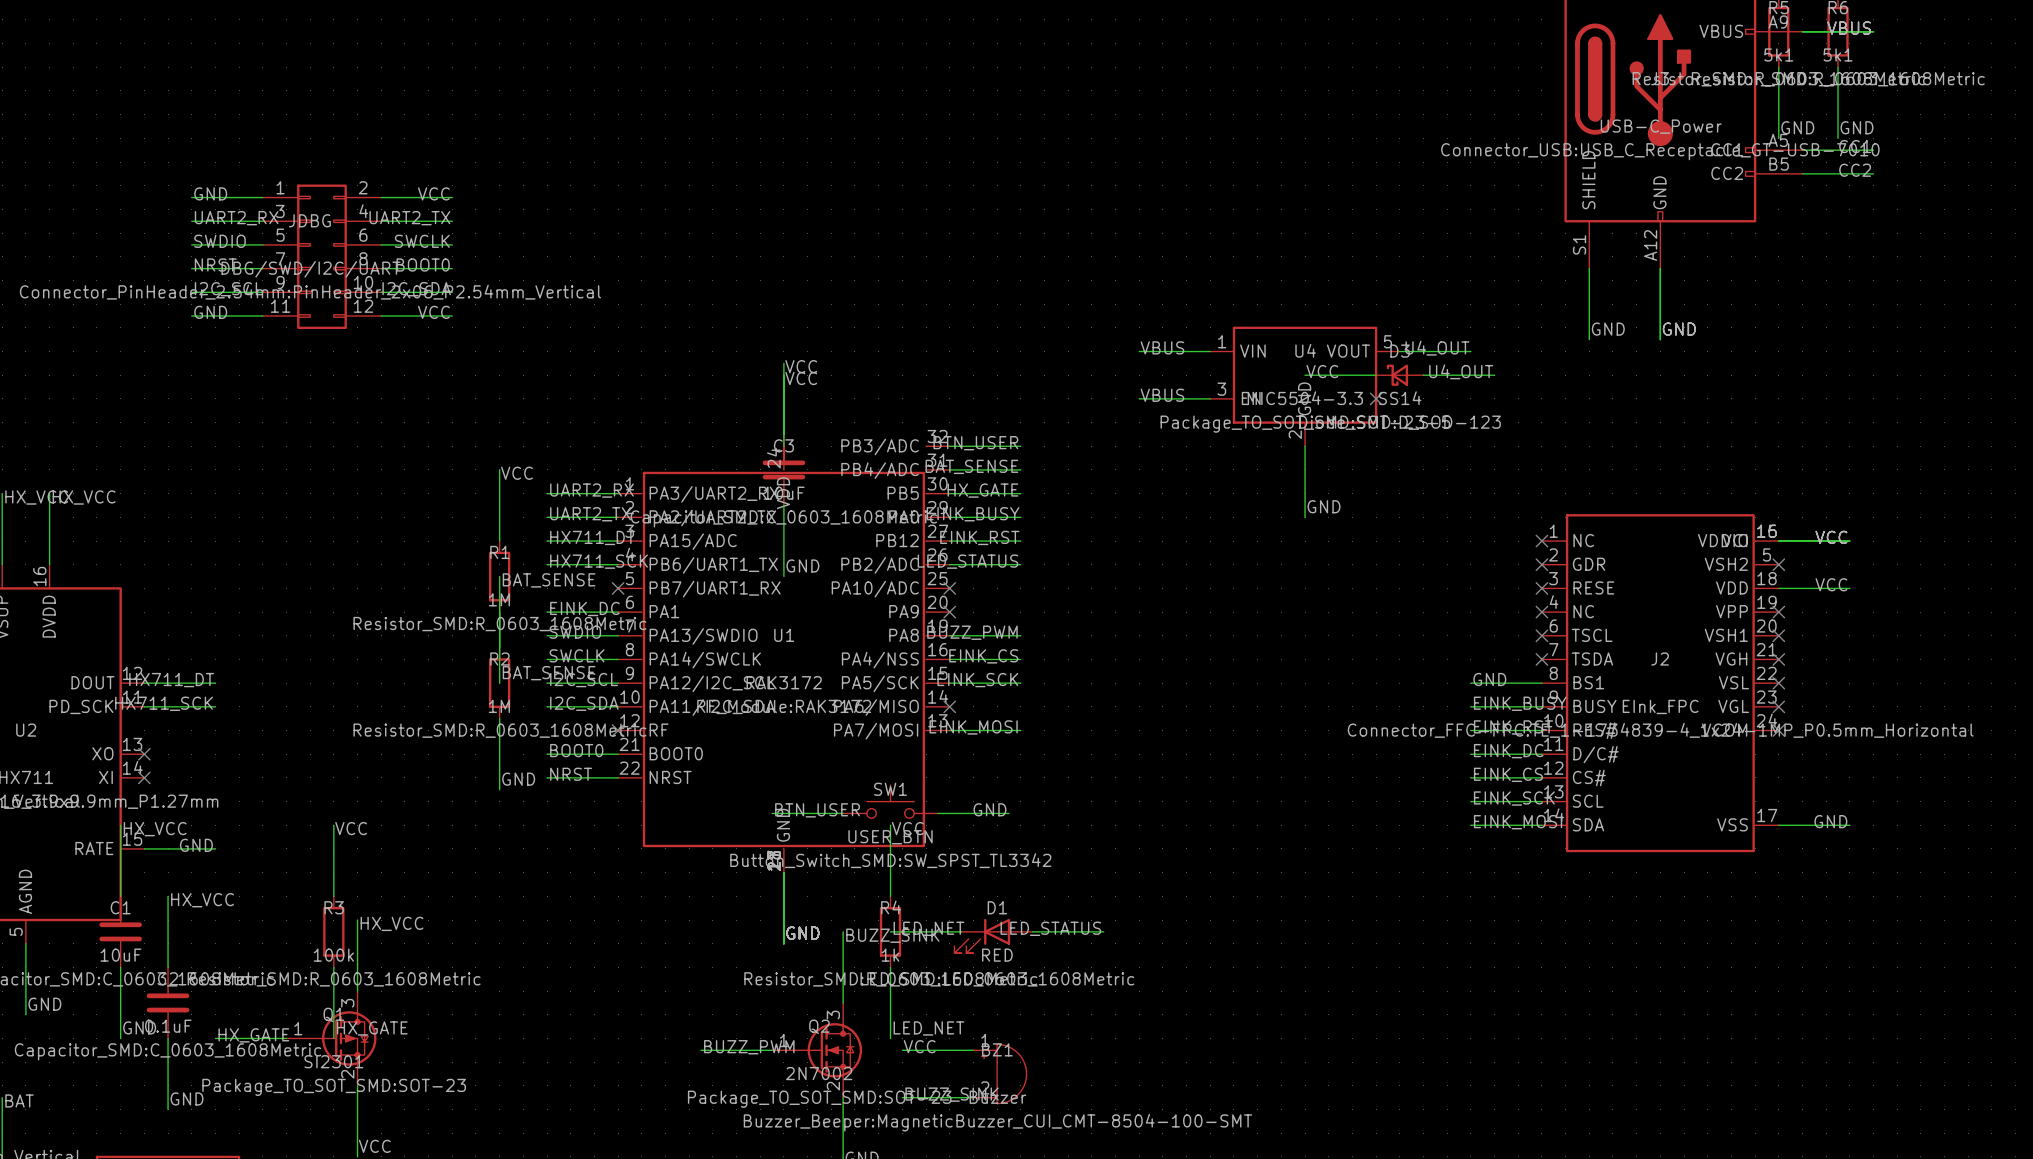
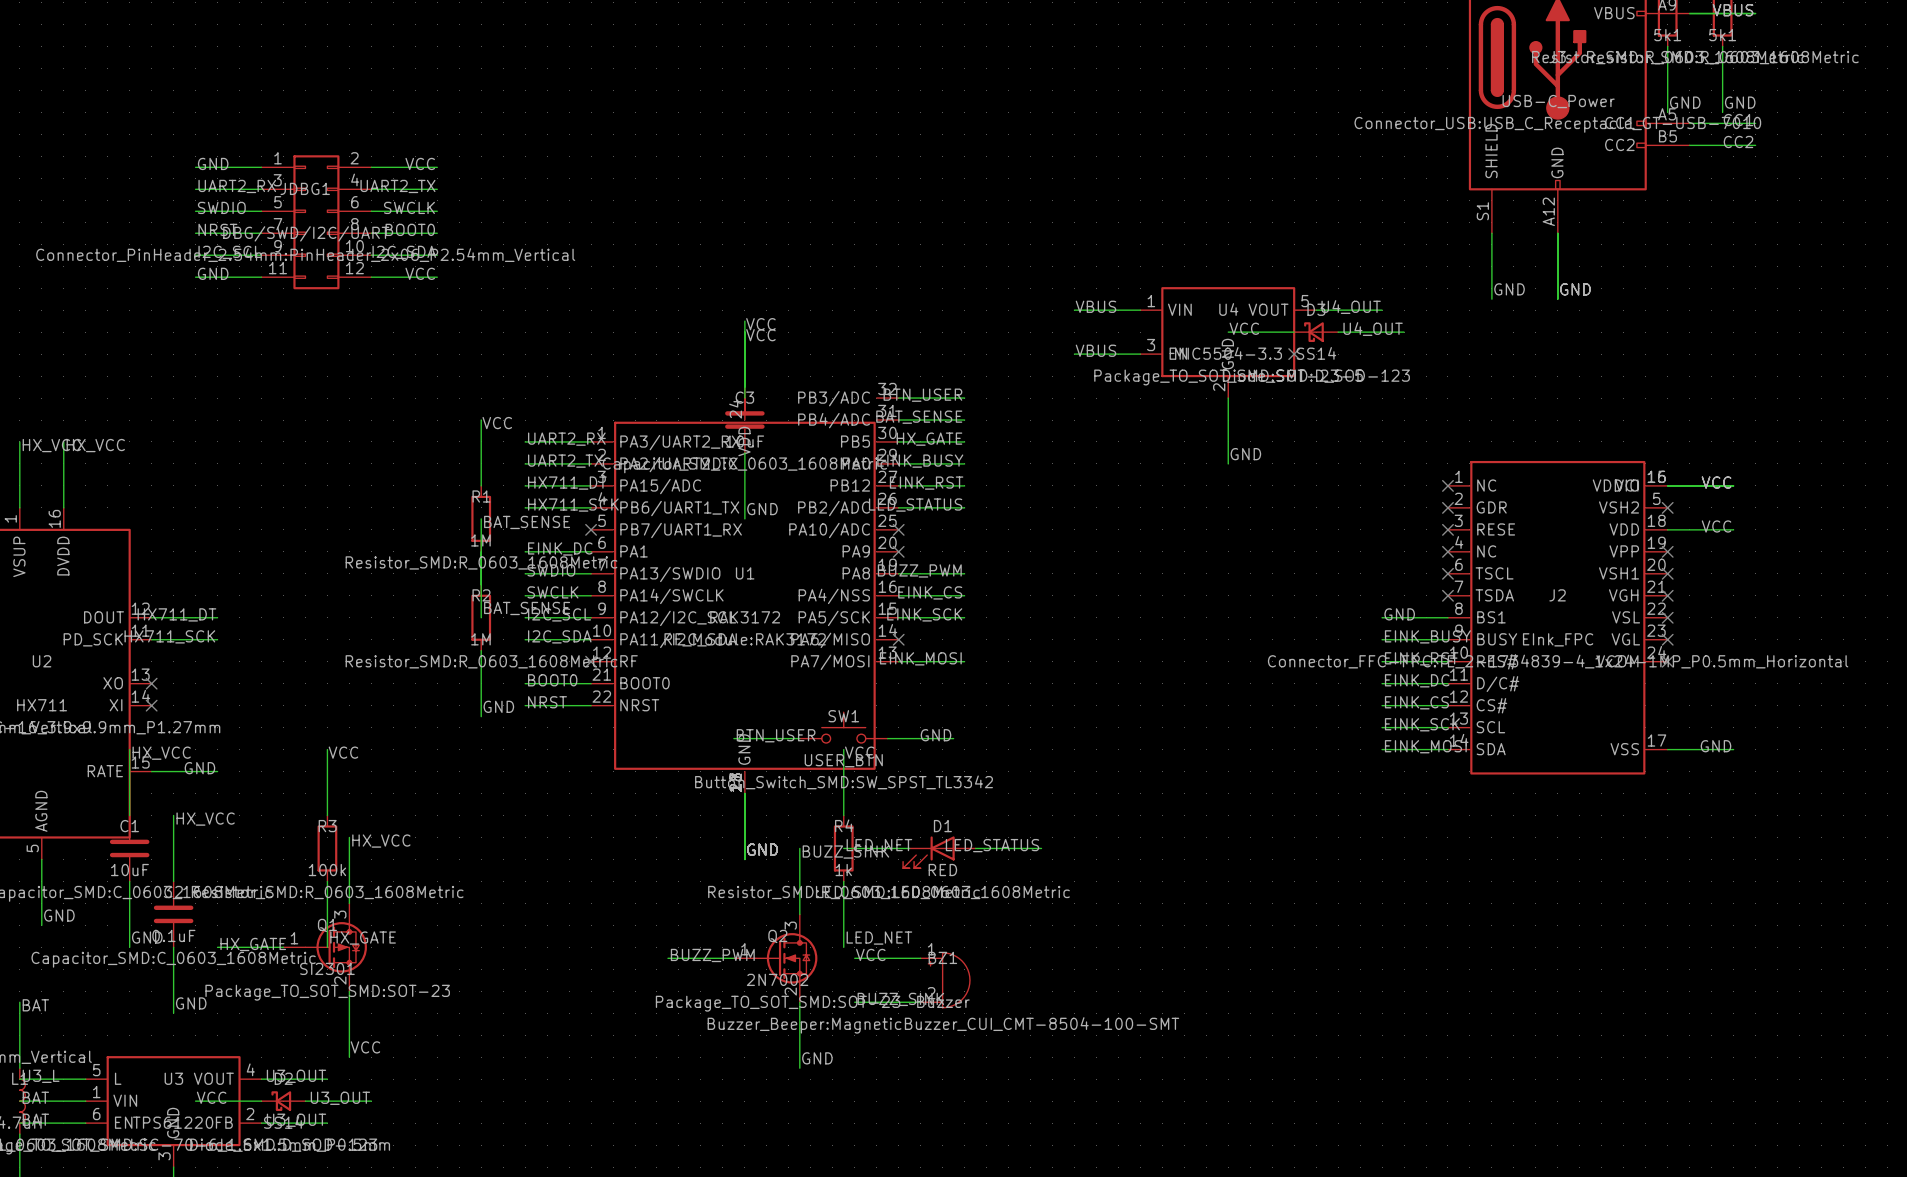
JDBG name: JDBG (309, 220) -> JDBG1 (305, 188)
J2 text: Connector_FFC-FPC:TE_1-1734839-4_1x24-1MP_P0.5mm_Horizontal (1660, 730) -> Connector_FFC-FPC:TE_2-1734839-4_1x24-1MP_P0.5mm_Horizontal (1558, 661)

